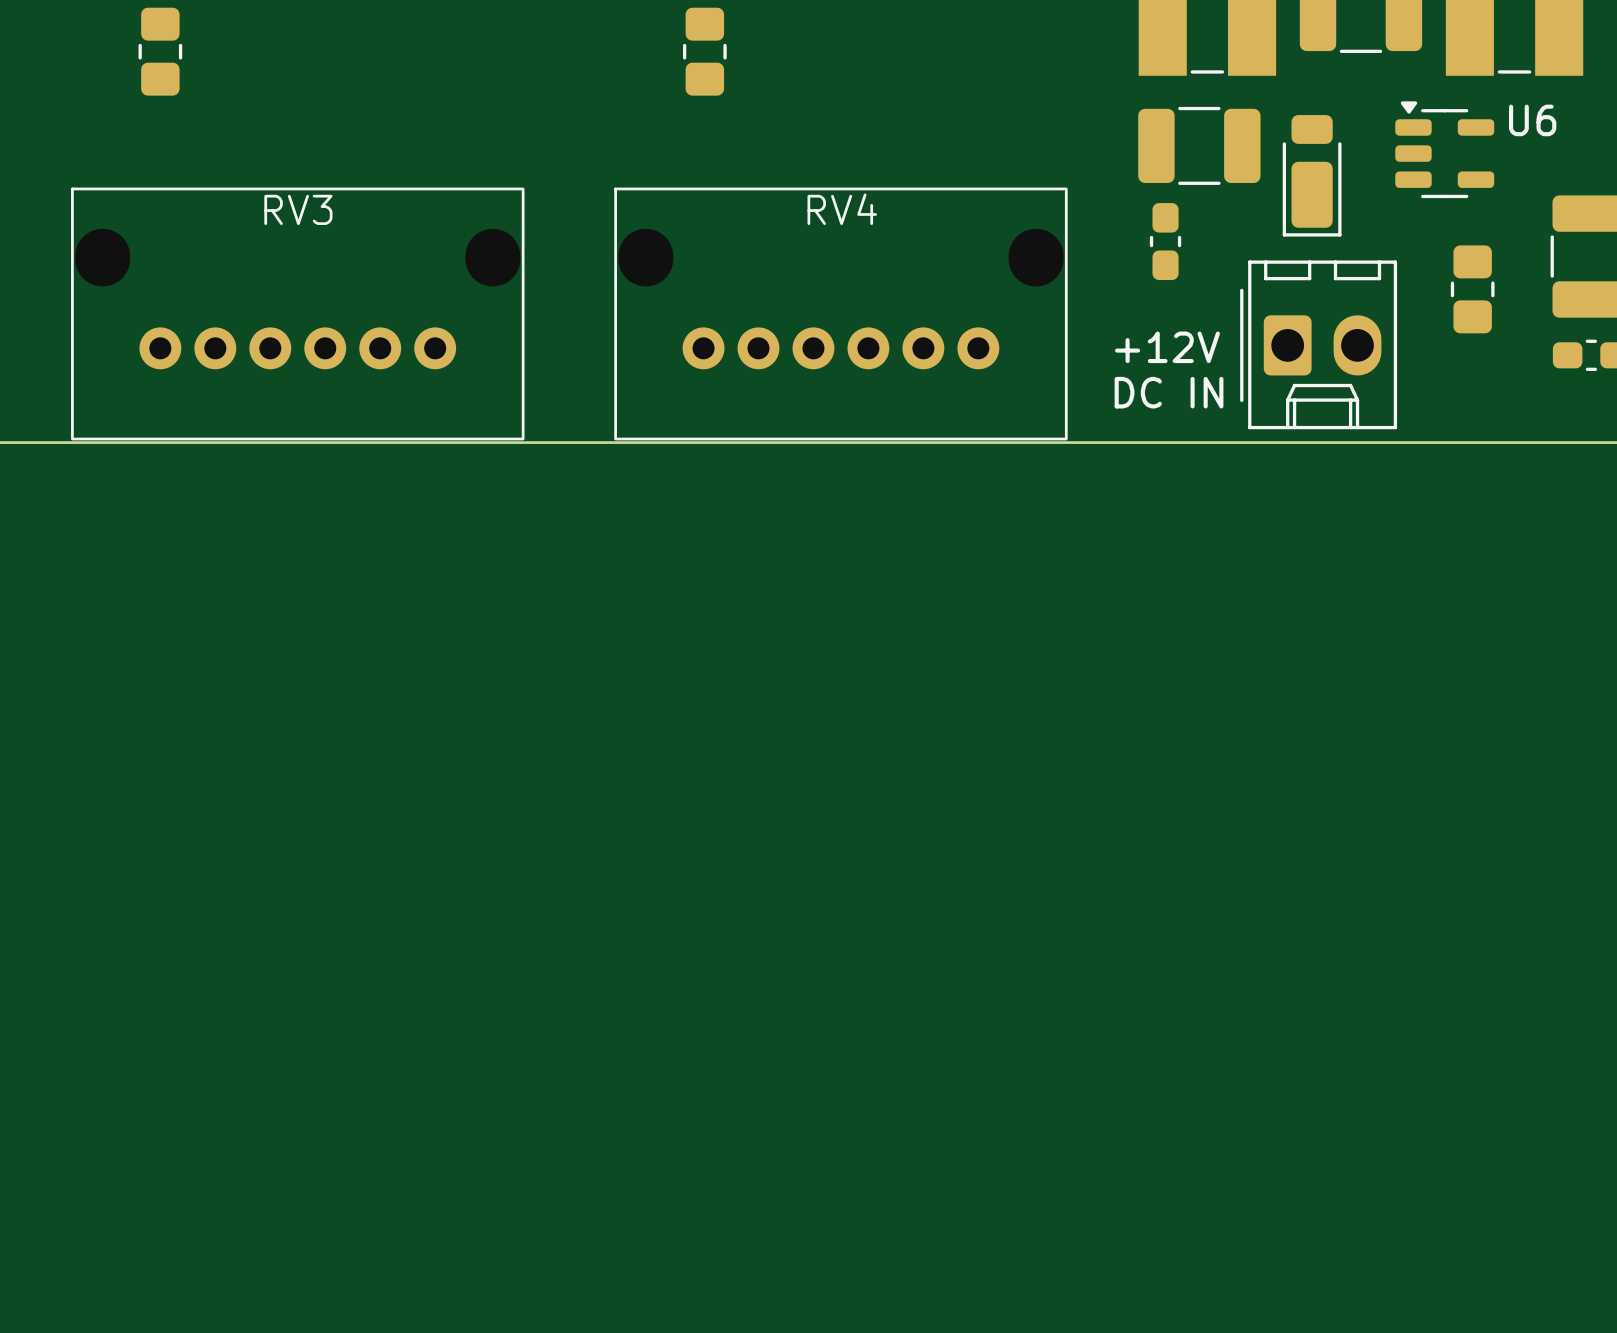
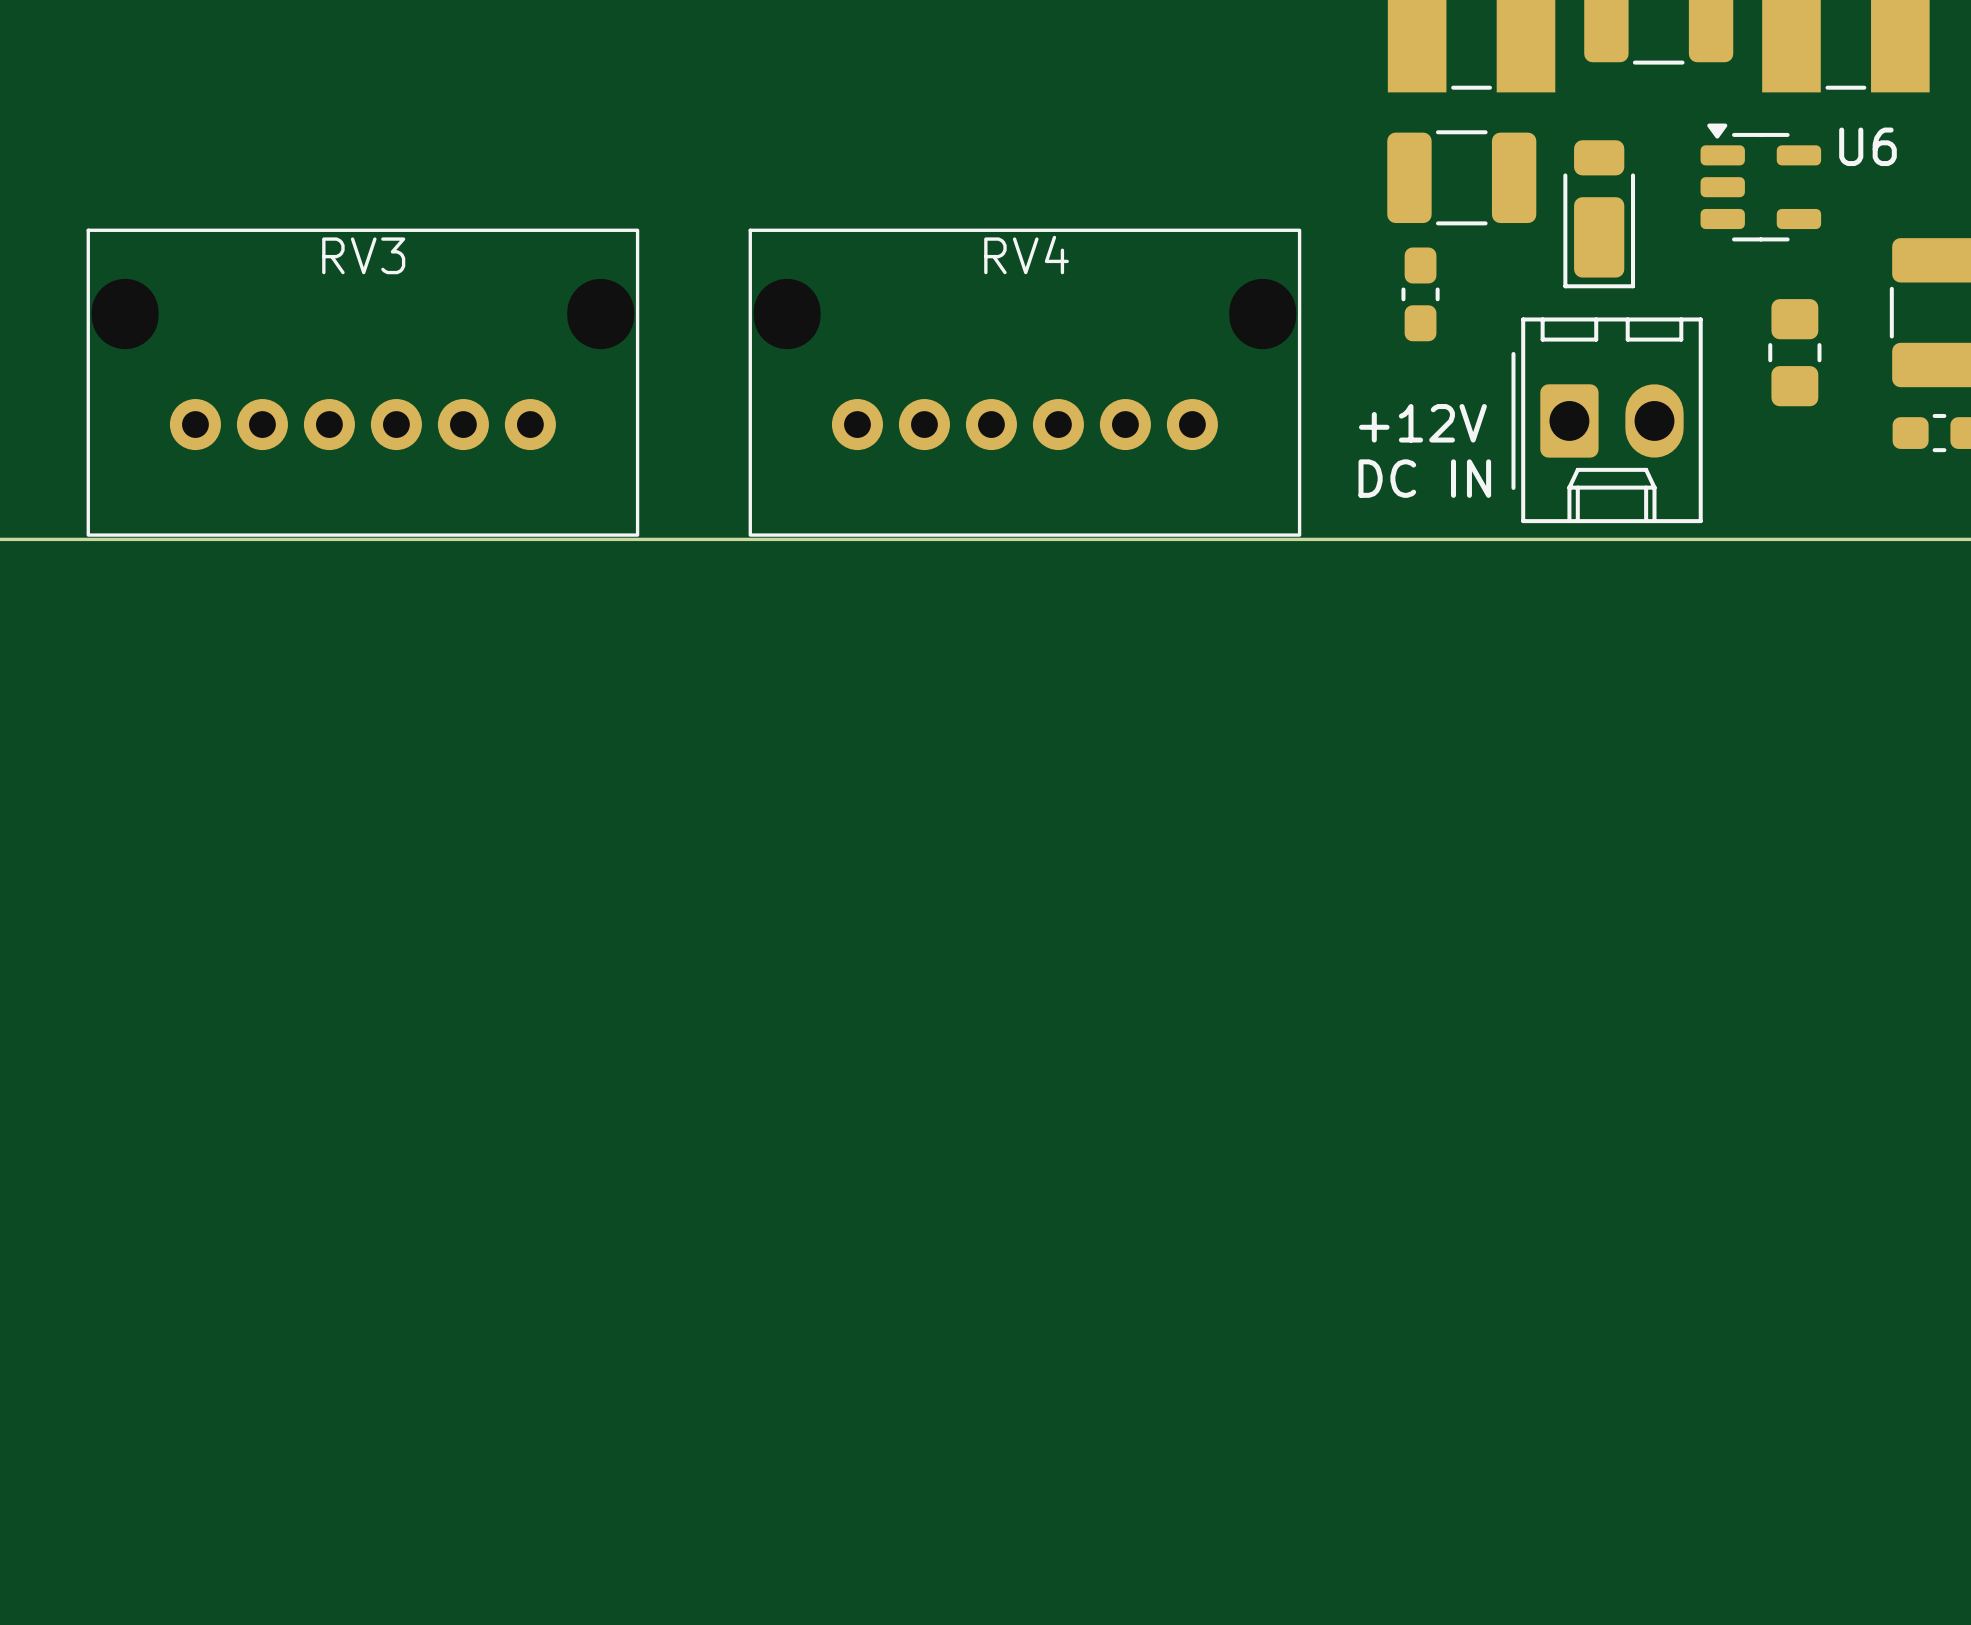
part: (160, 51) -> none
part: (704, 51) -> none

